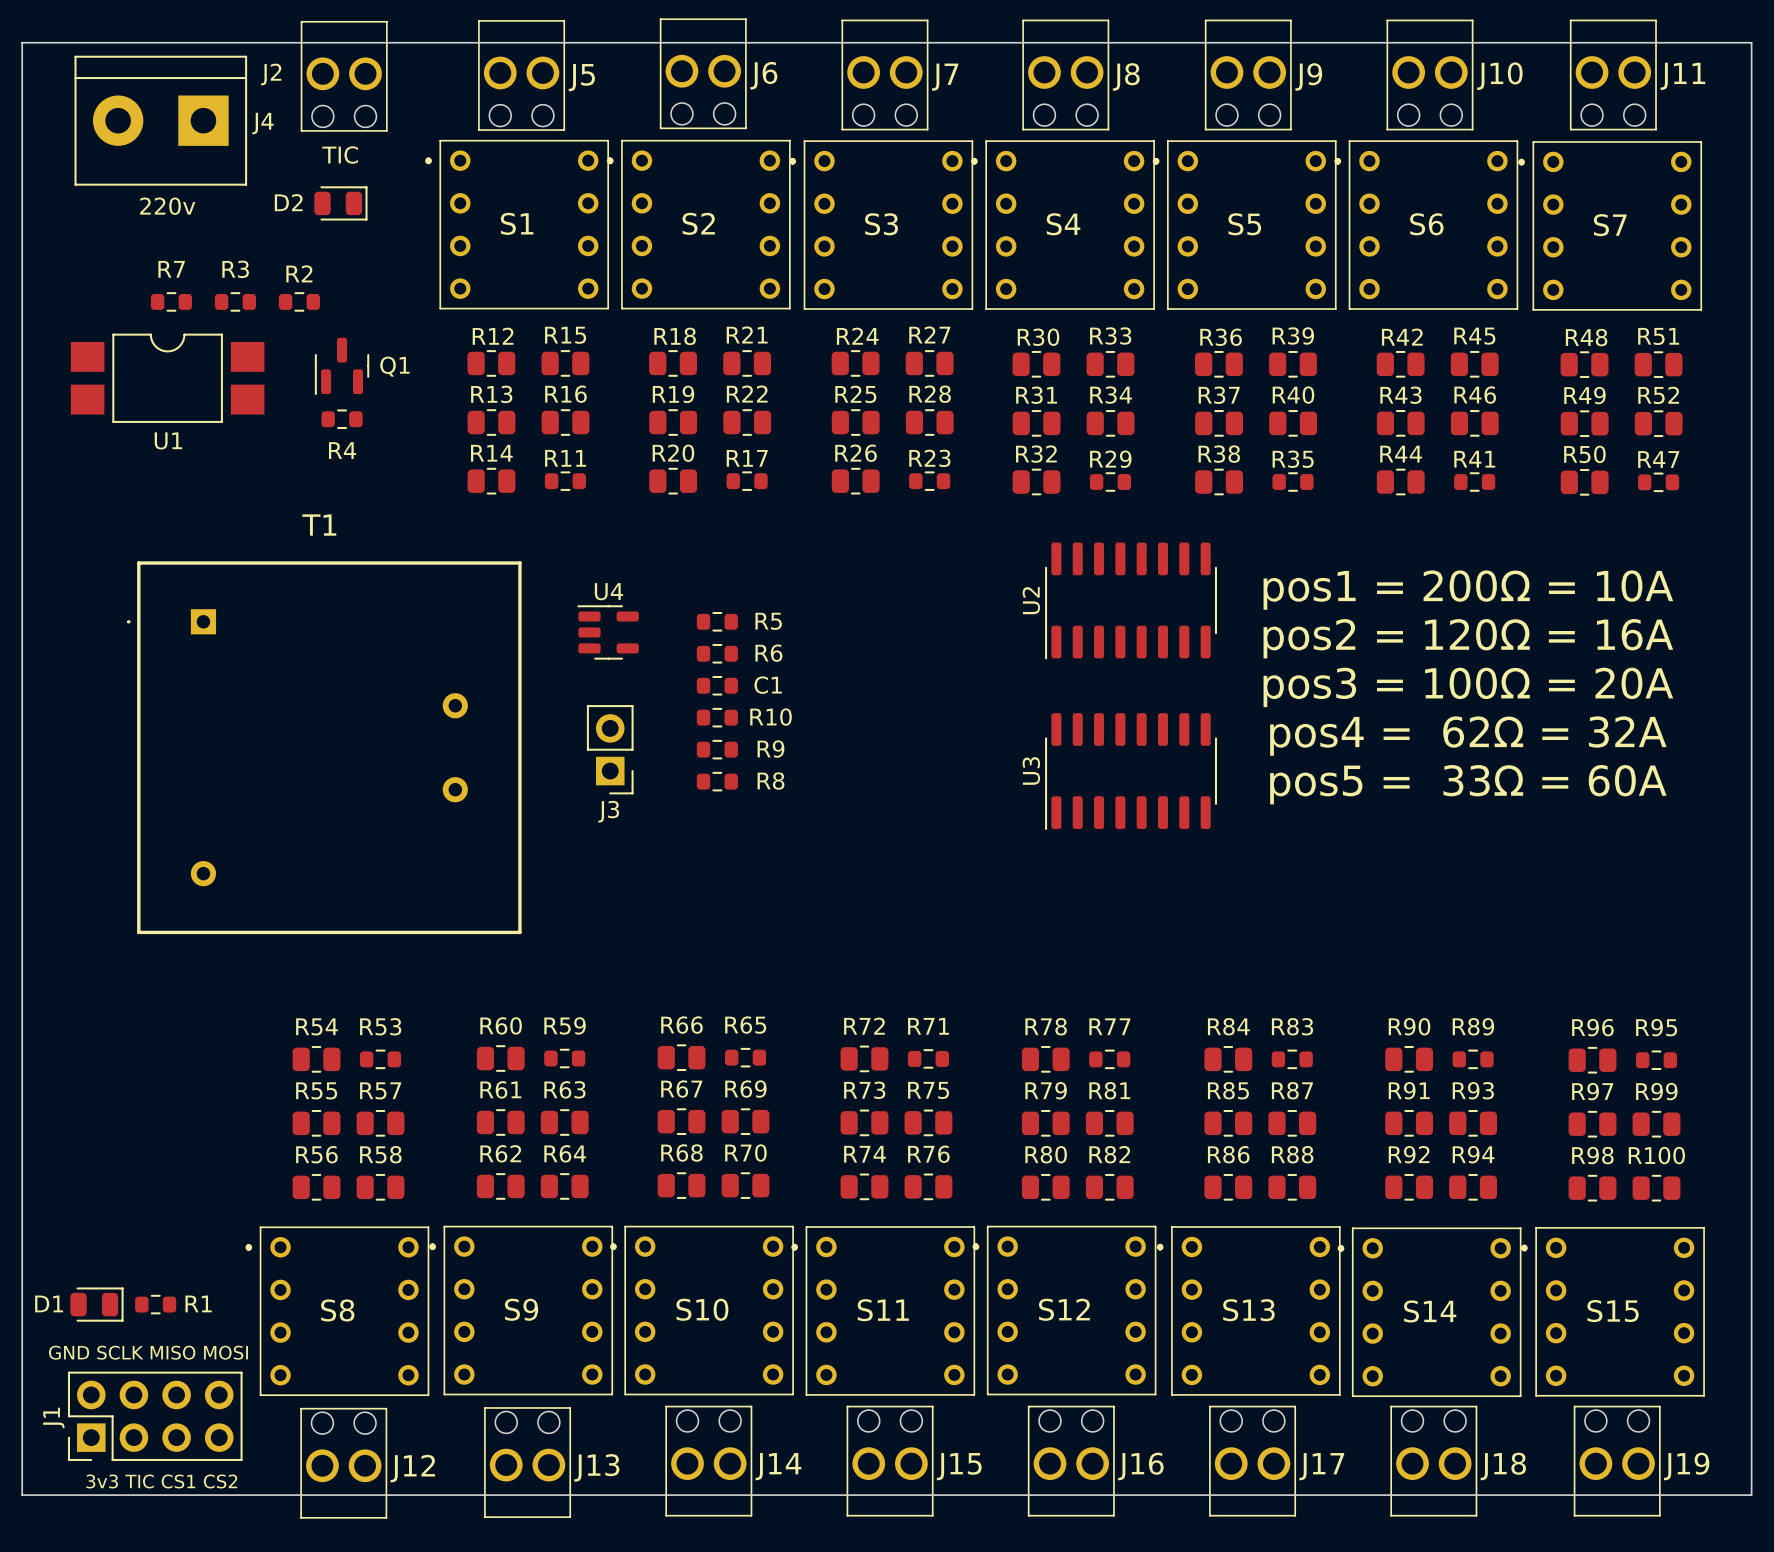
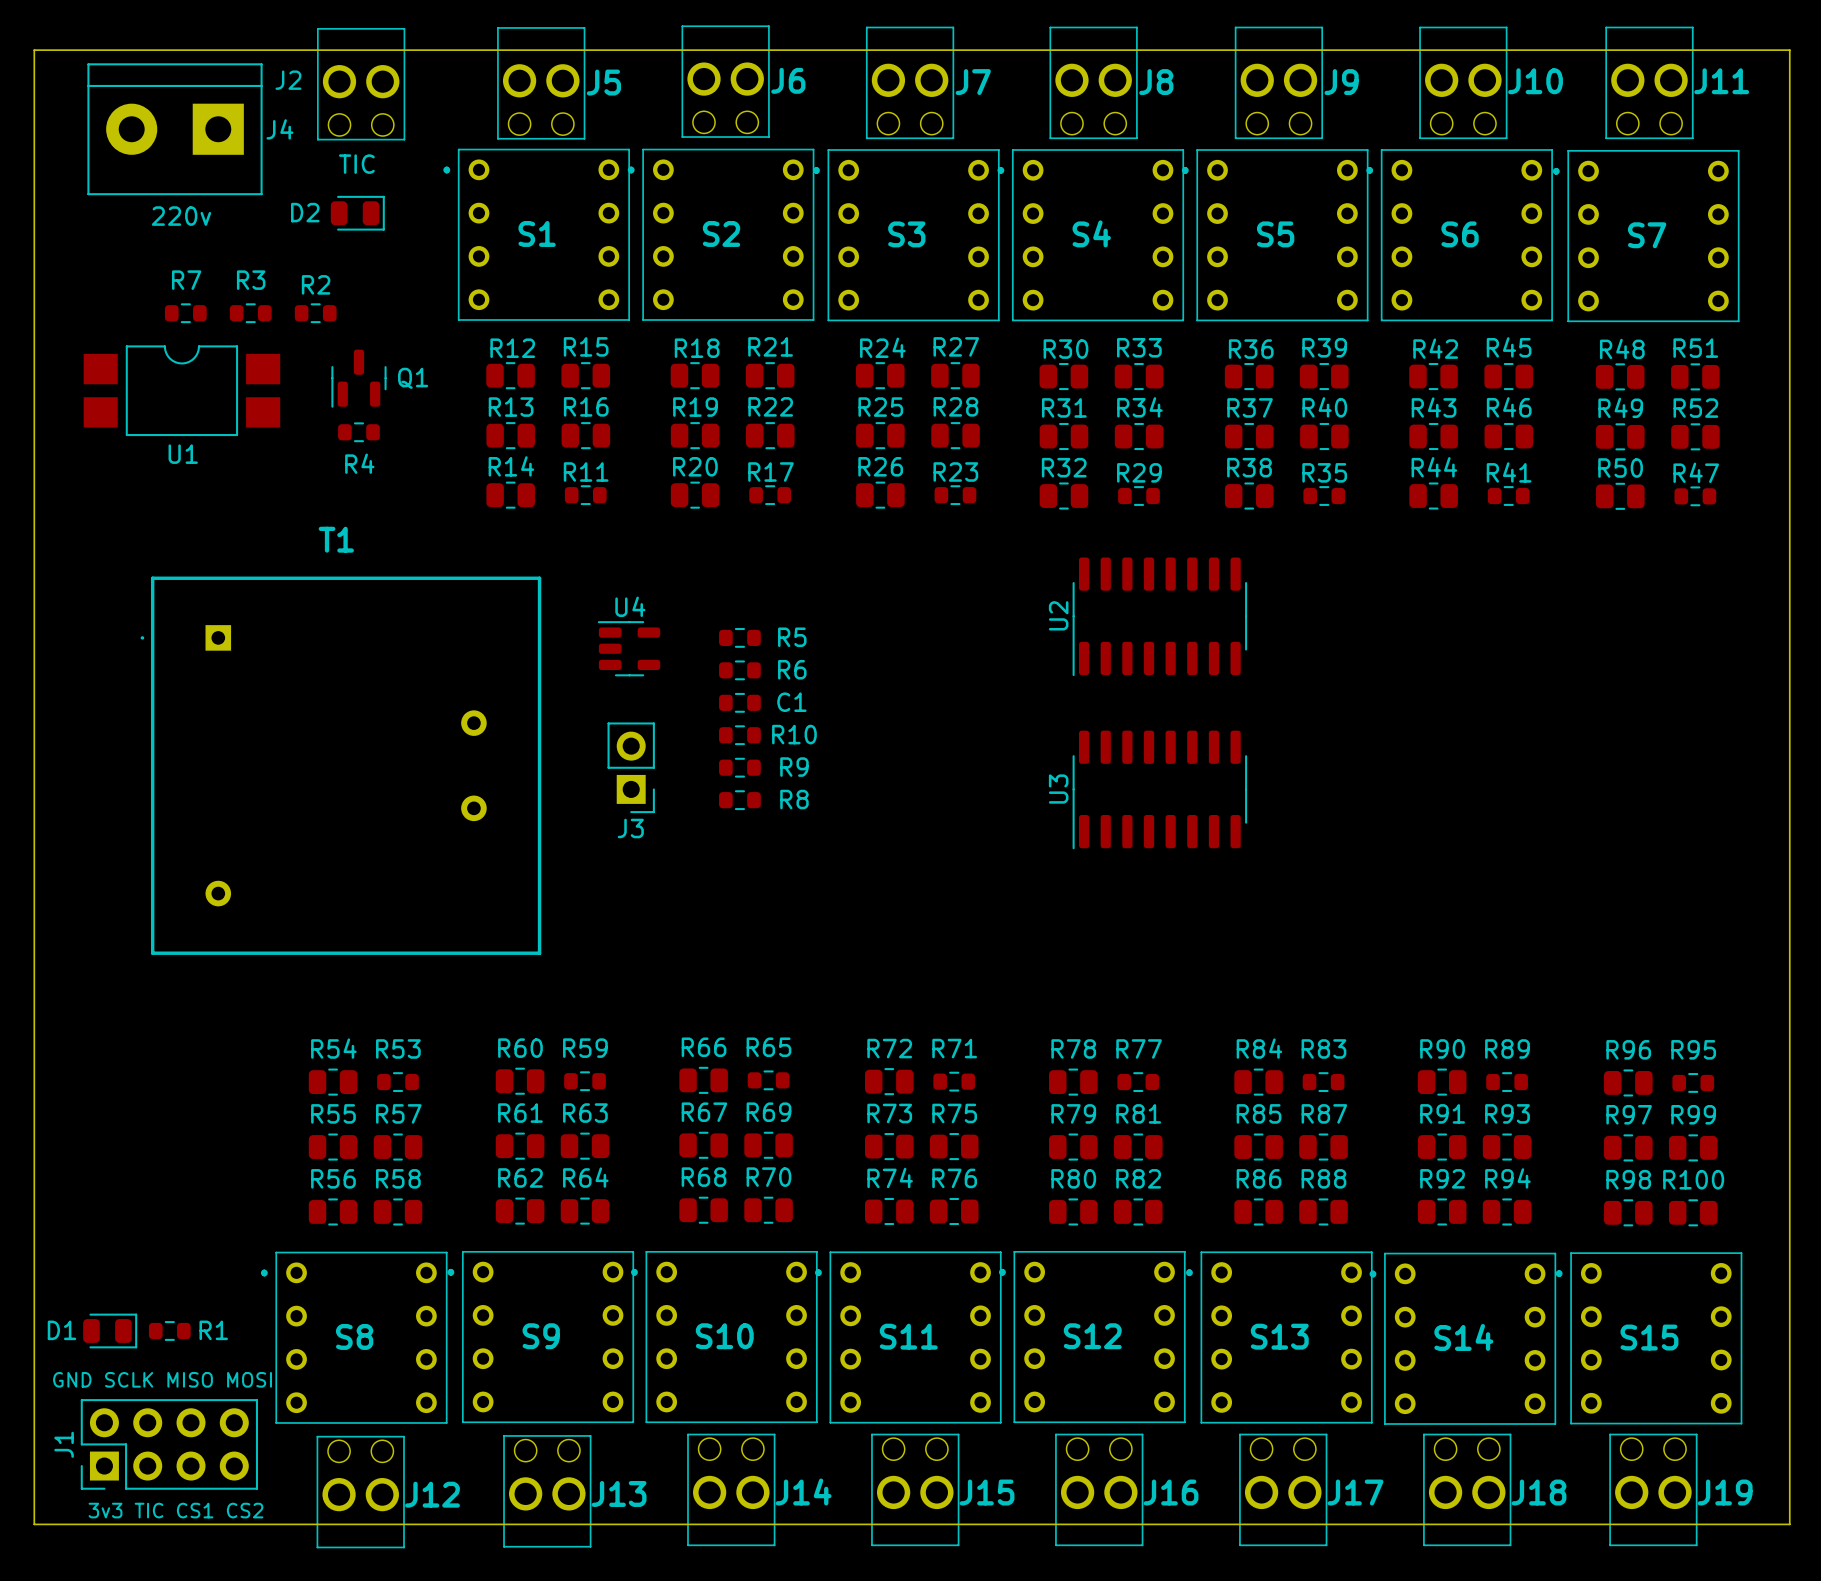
text: pos1 = 200Ω = 10A (1468, 590) -> none
text: pos2 = 120Ω = 16A (1468, 638) -> none
text: pos3 = 100Ω = 20A (1468, 687) -> none
text: pos4 = 62Ω = 32A (1468, 736) -> none
text: pos5 = 33Ω = 60A (1468, 784) -> none

